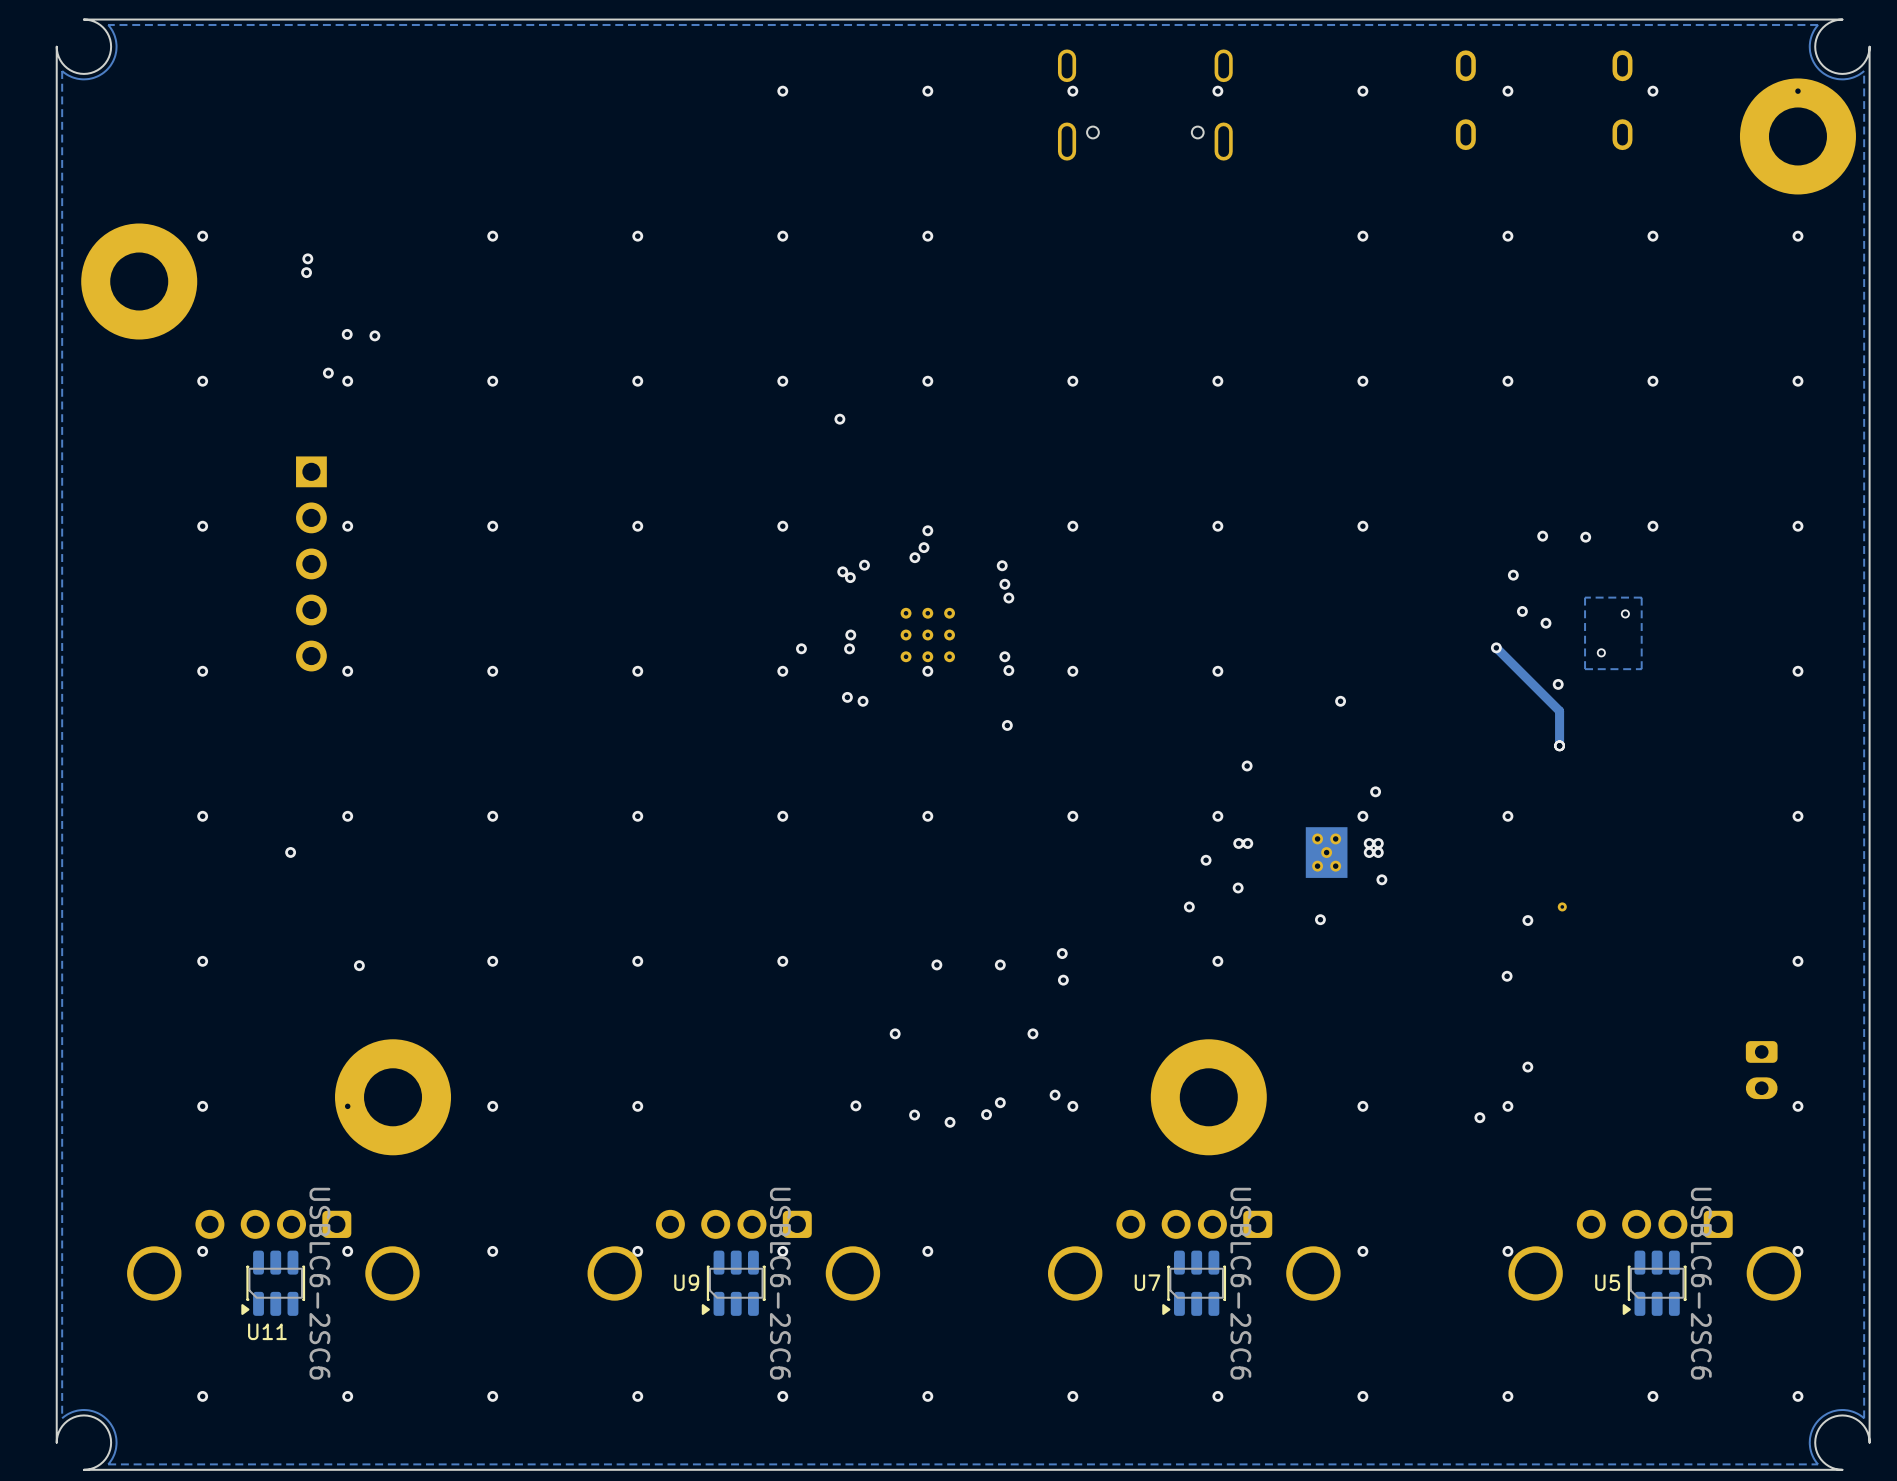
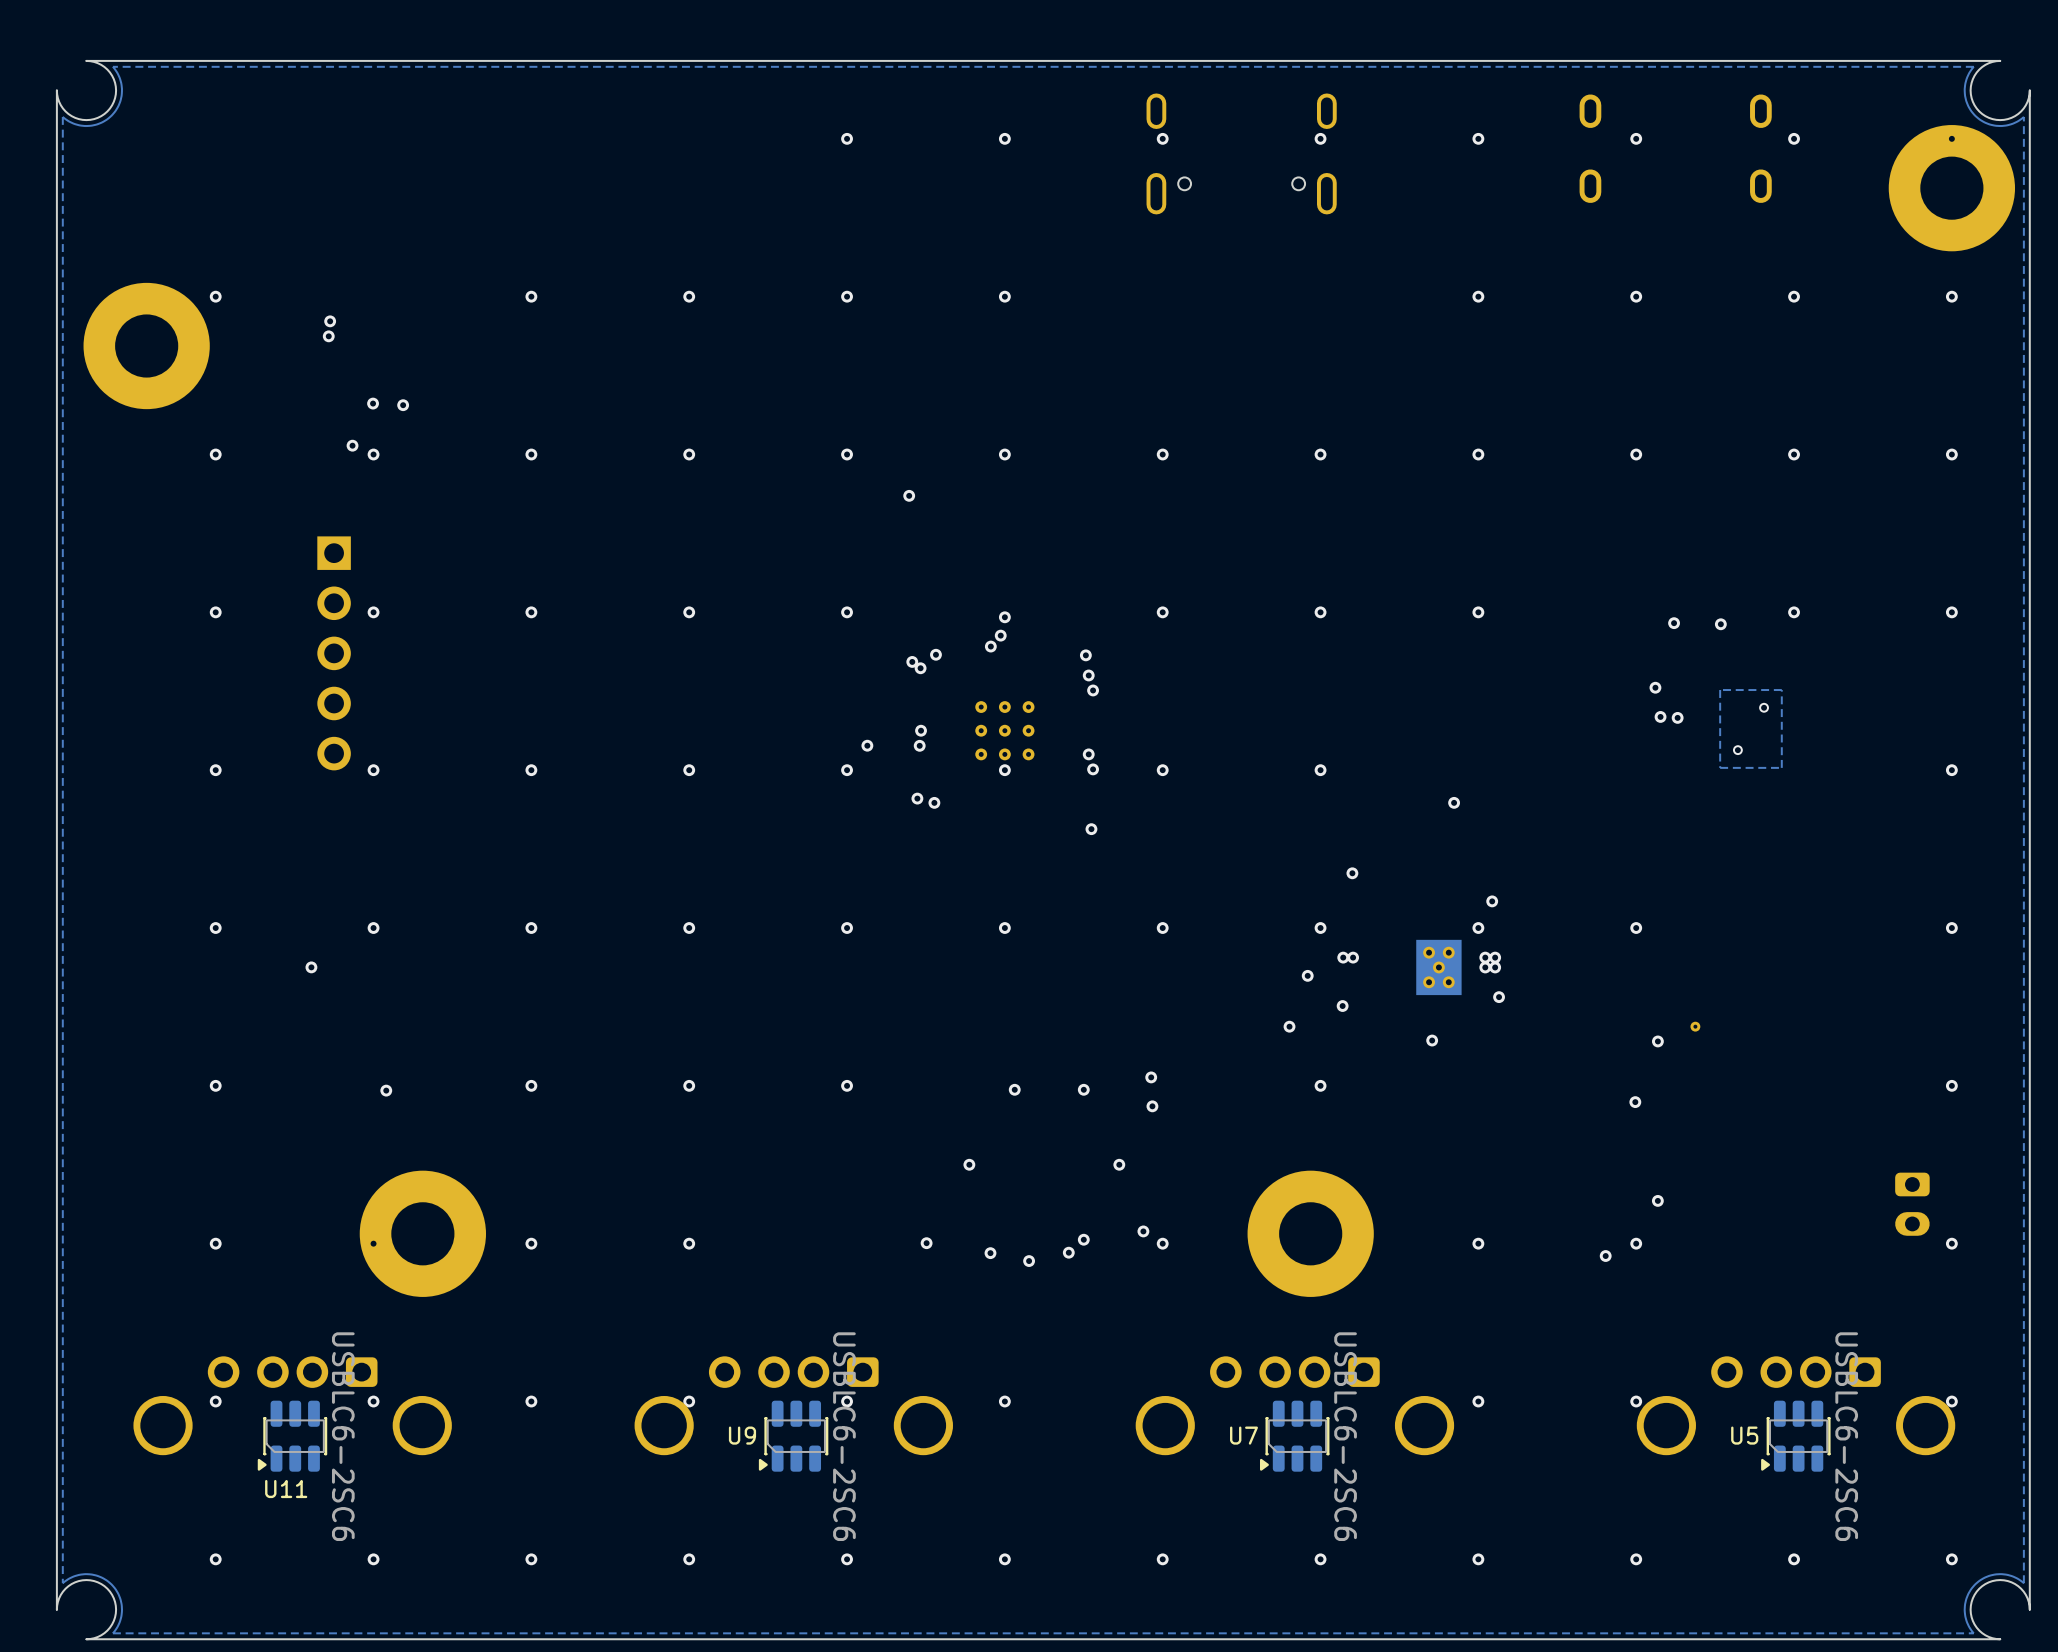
via: (1513, 575) -> none
via: none -> (1655, 687)
via: (1522, 611) -> none
via: none -> (1660, 716)
track: (1496, 647) (1559, 711) (1559, 745) -> none
via: (1496, 647) -> none
via: (1558, 684) -> none
via: (1559, 745) -> none

